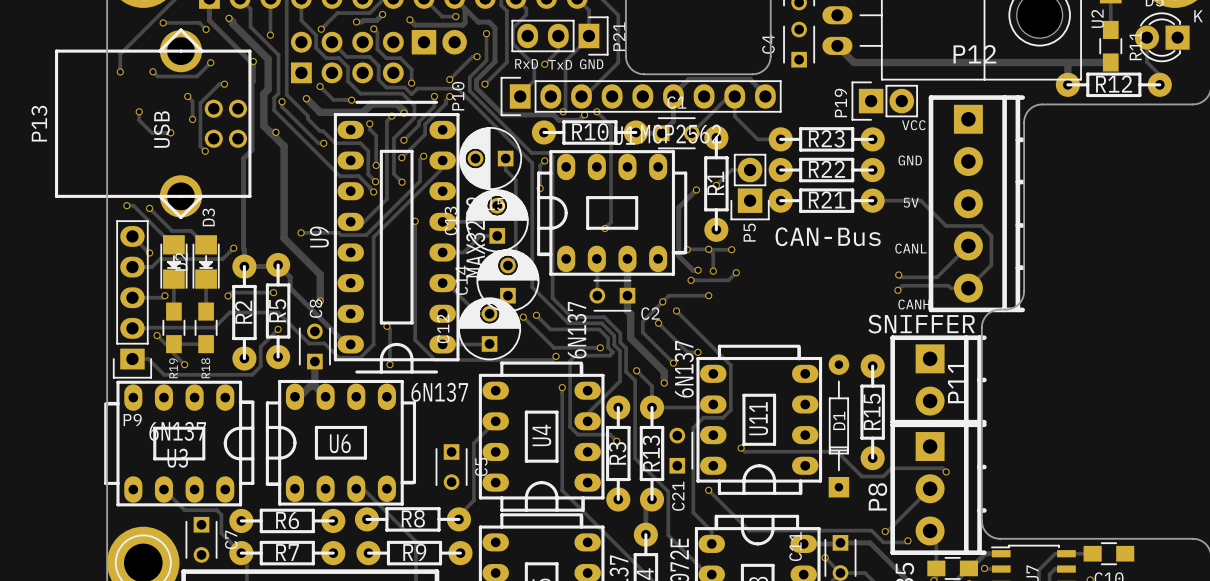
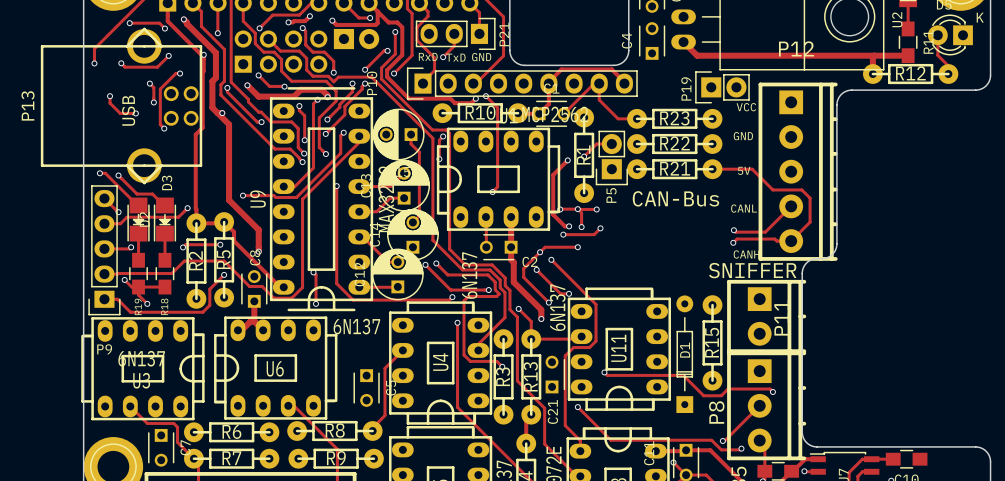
track: (588, 35) (565, 61) (565, 109) (563, 111) -> none
via: (563, 111) -> none

